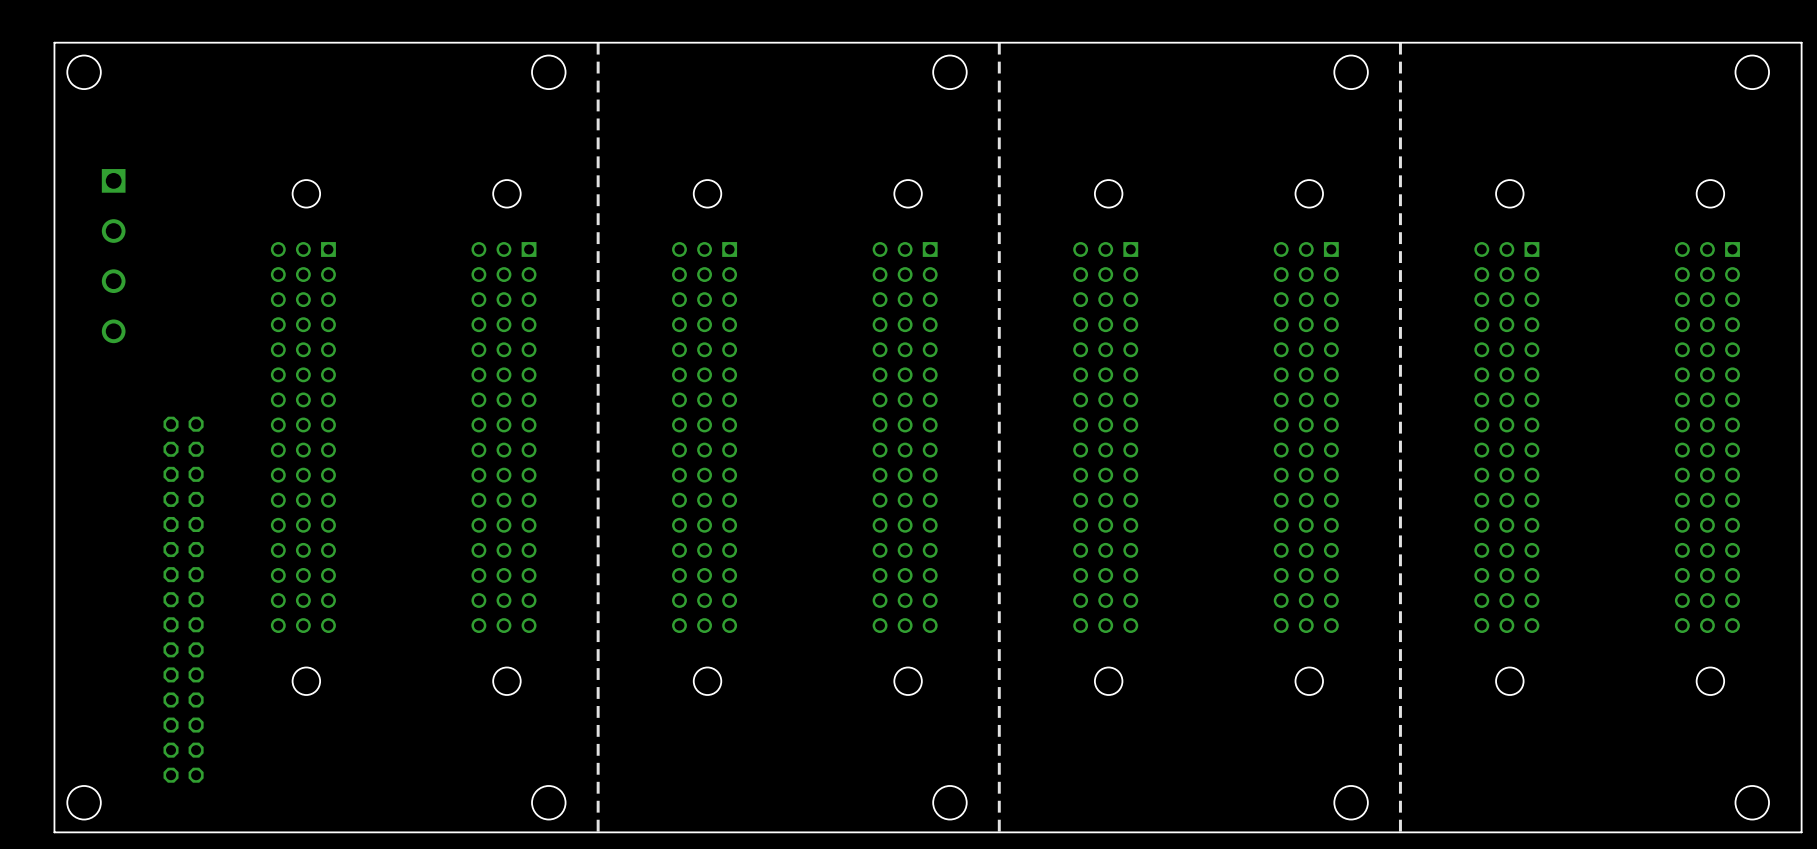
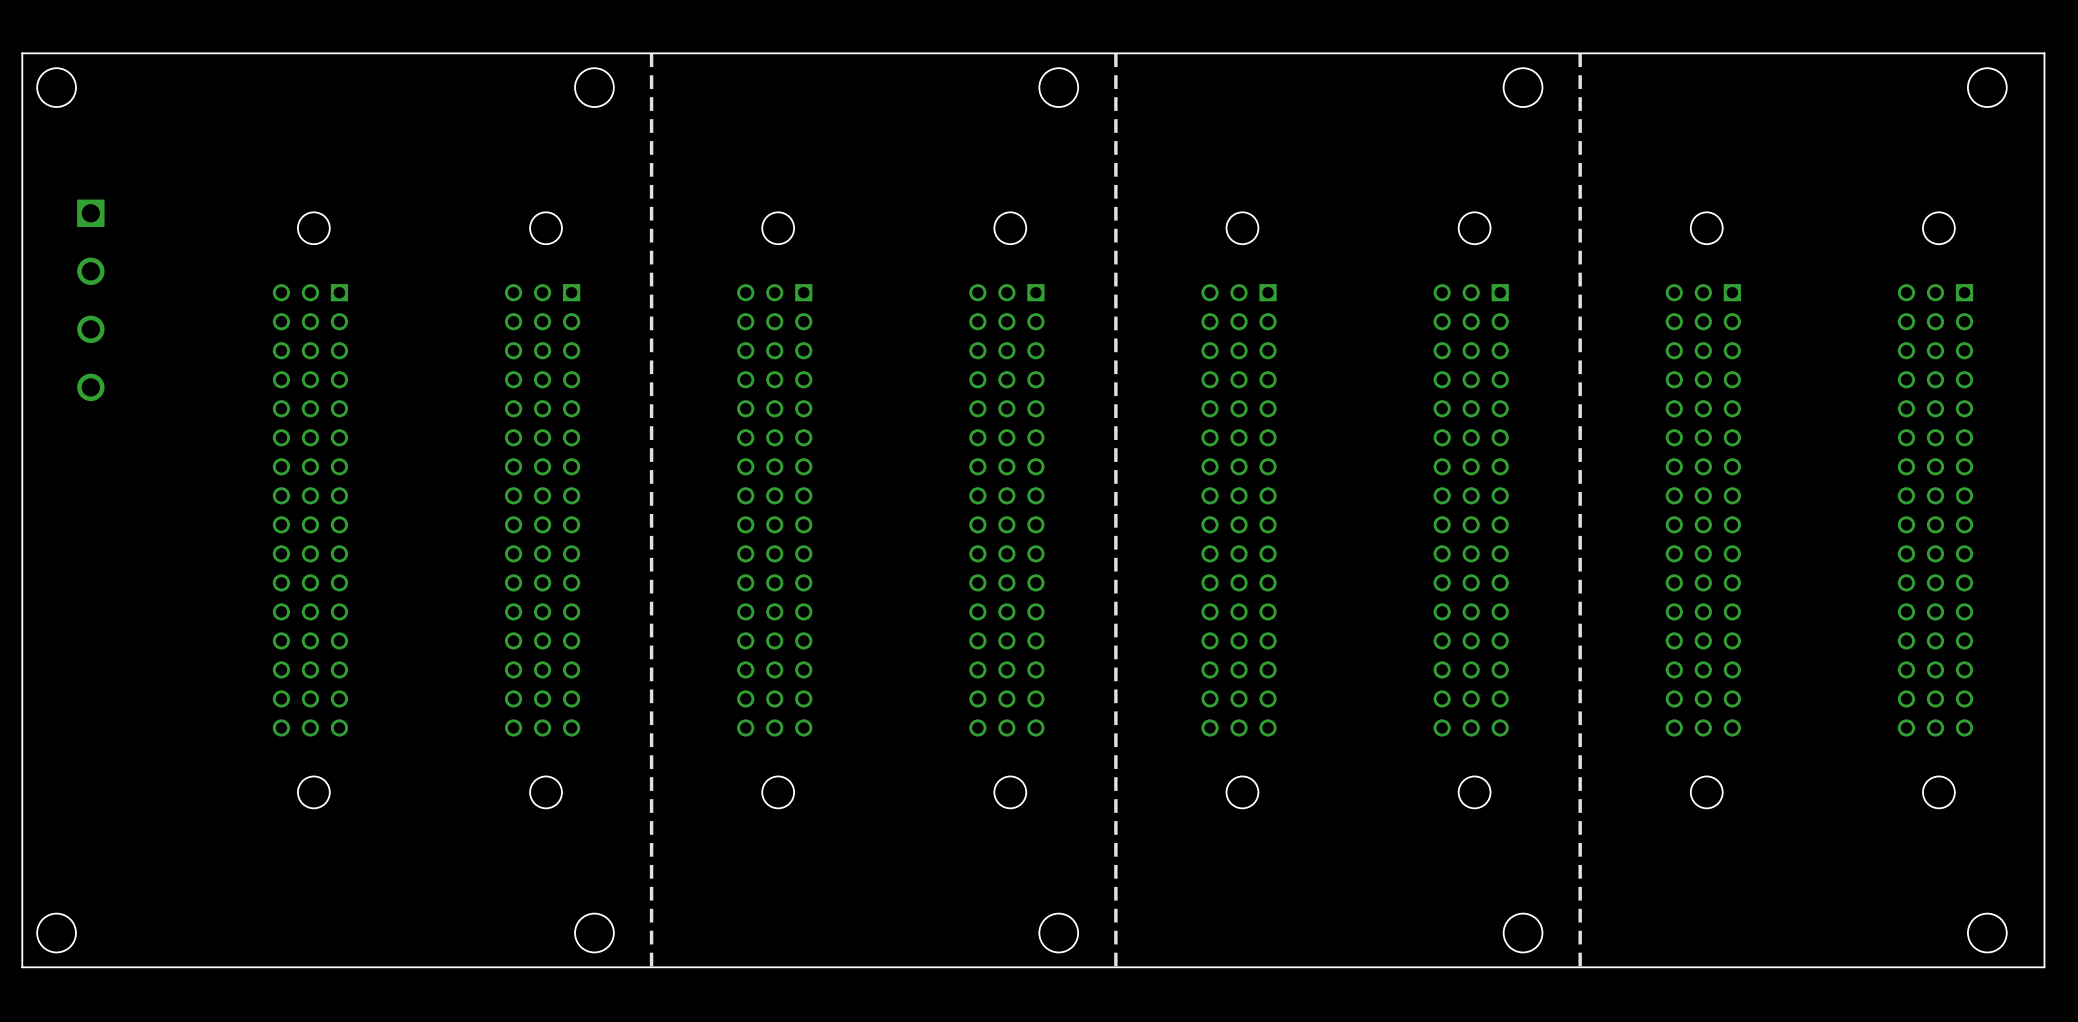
part: (183, 599) -> none

